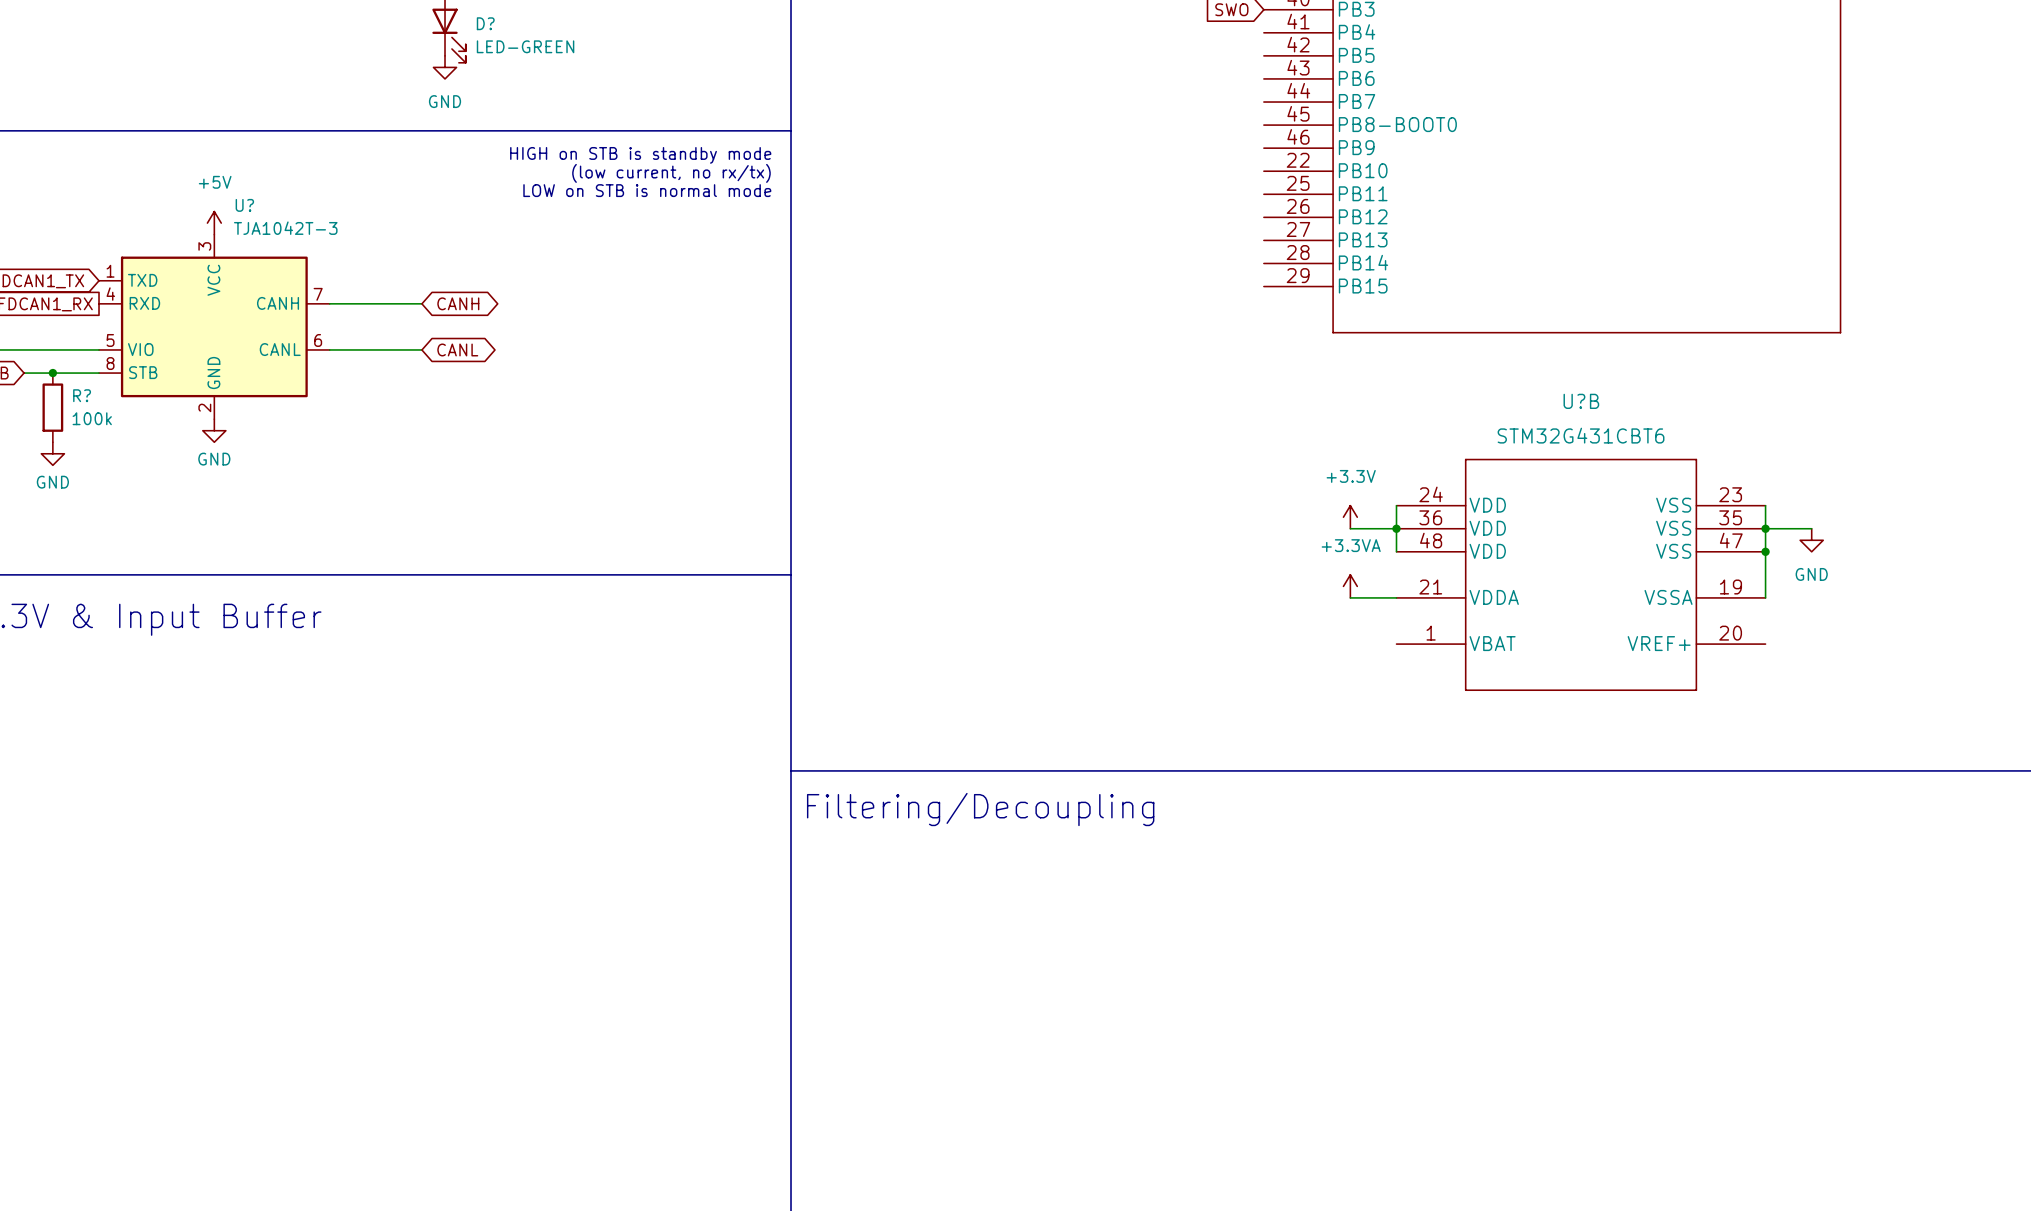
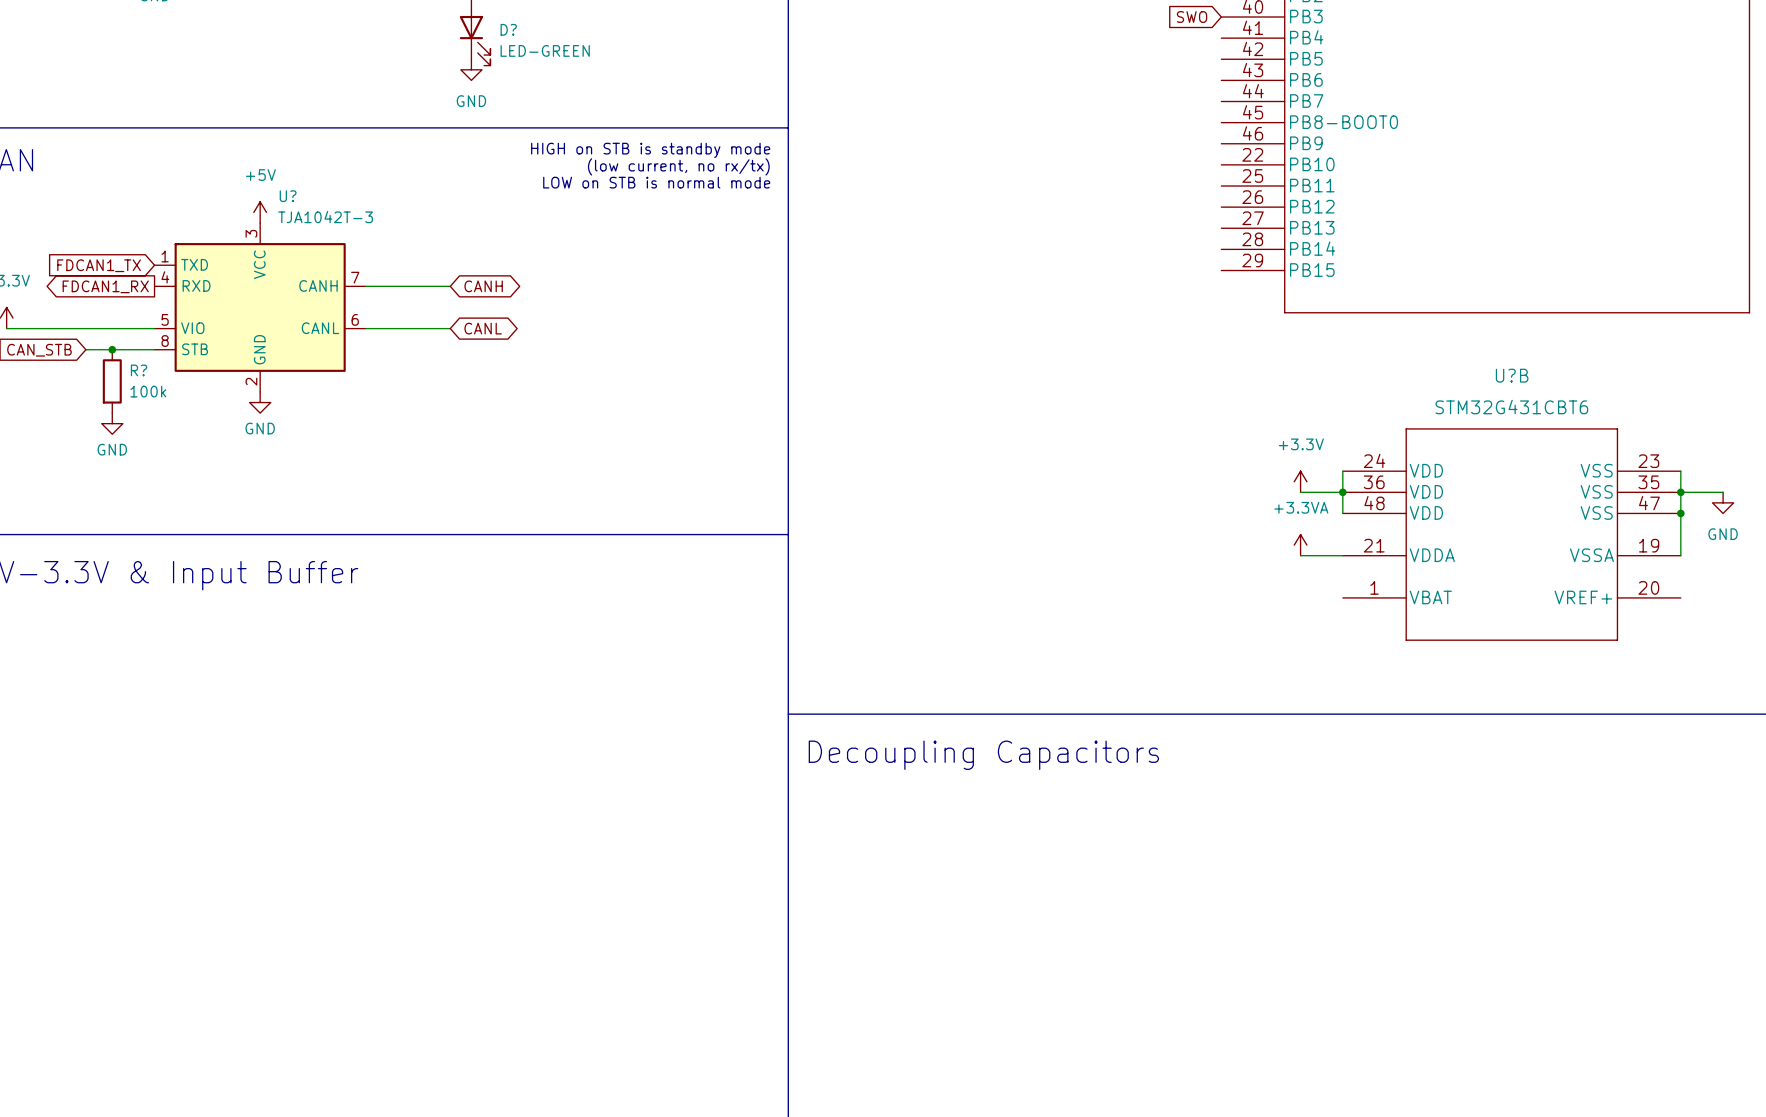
text: Filtering/Decoupling (980, 809) -> none
text: none -> Decoupling Capacitors (983, 755)

